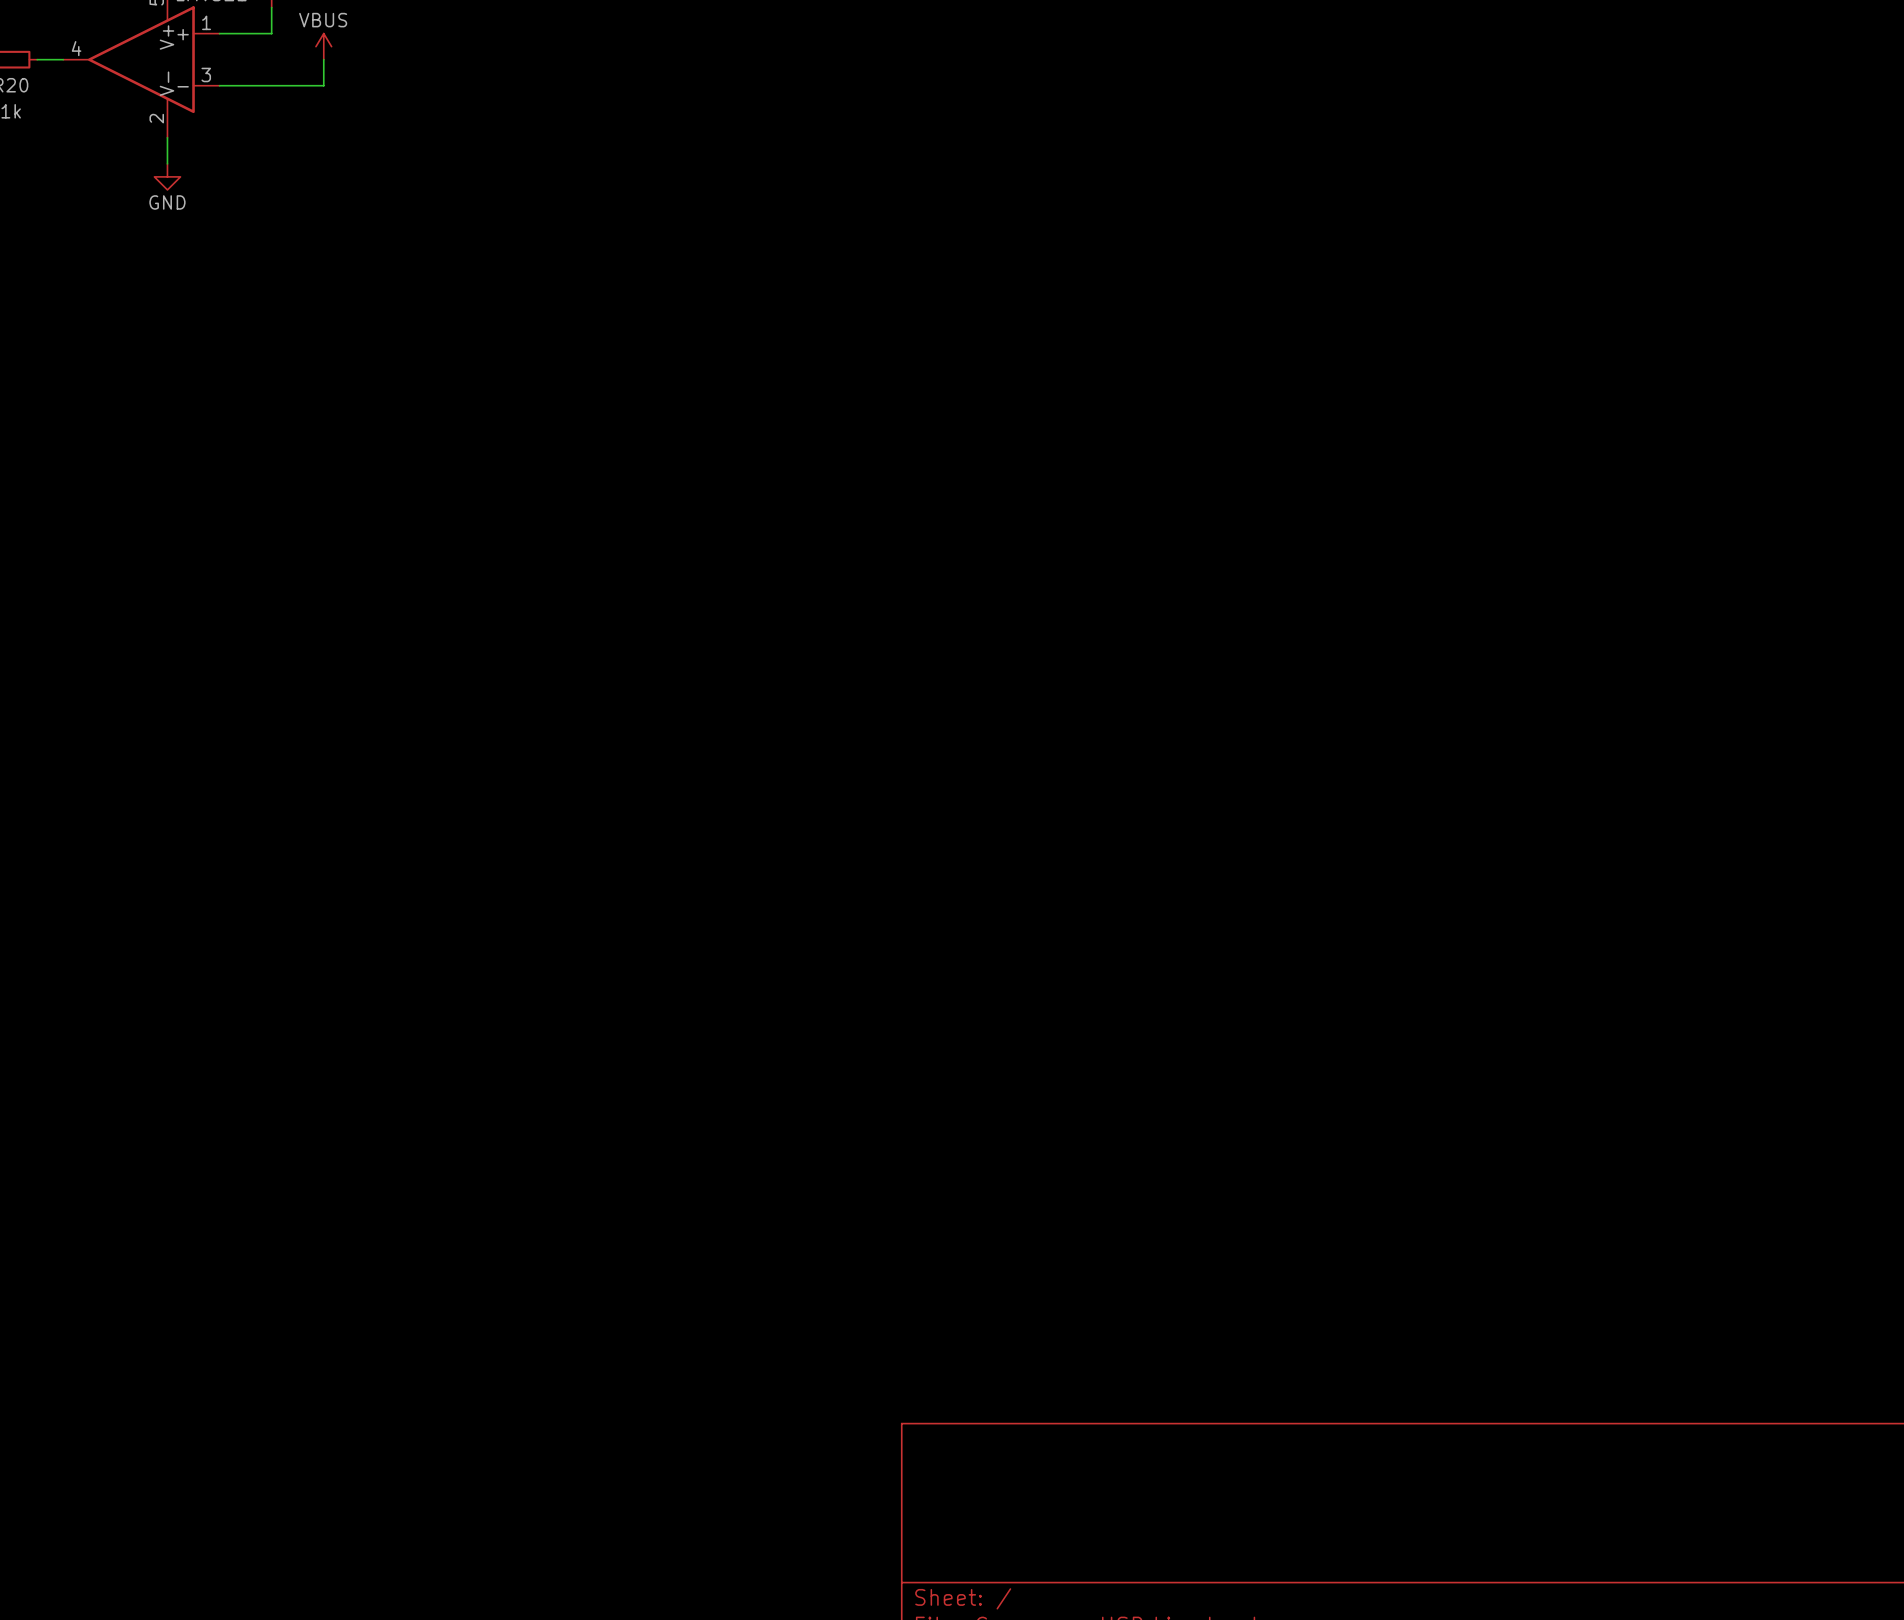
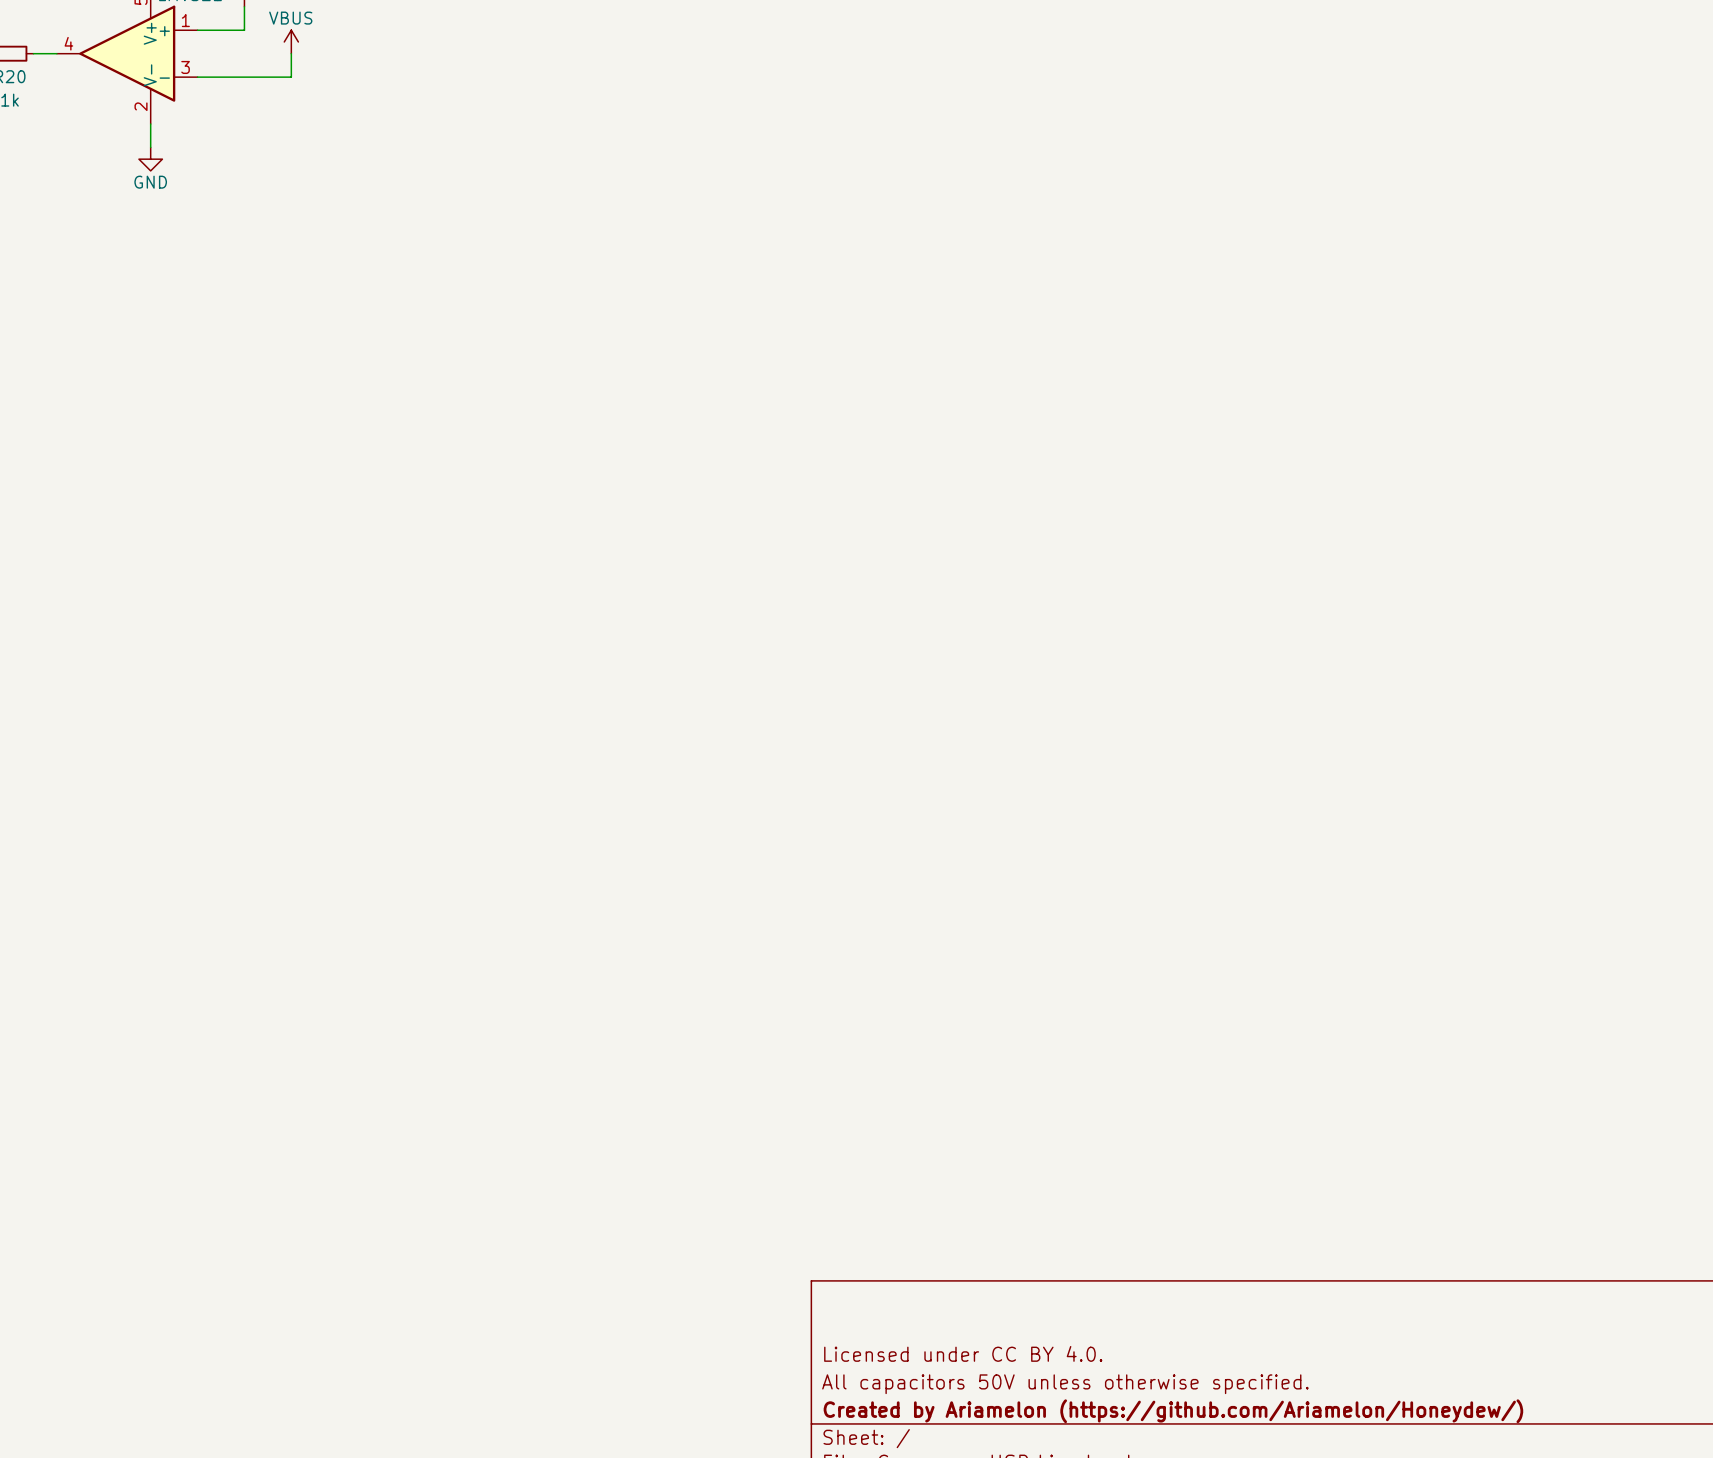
title block: none -> Licensed under CC BY 4.0. (963, 1353)
title block: none -> All capacitors 50V unless otherwise specified. (1065, 1384)
title block: none -> Created by Ariamelon (https://github.com/Ariamelon/Honeydew/) (1173, 1411)

